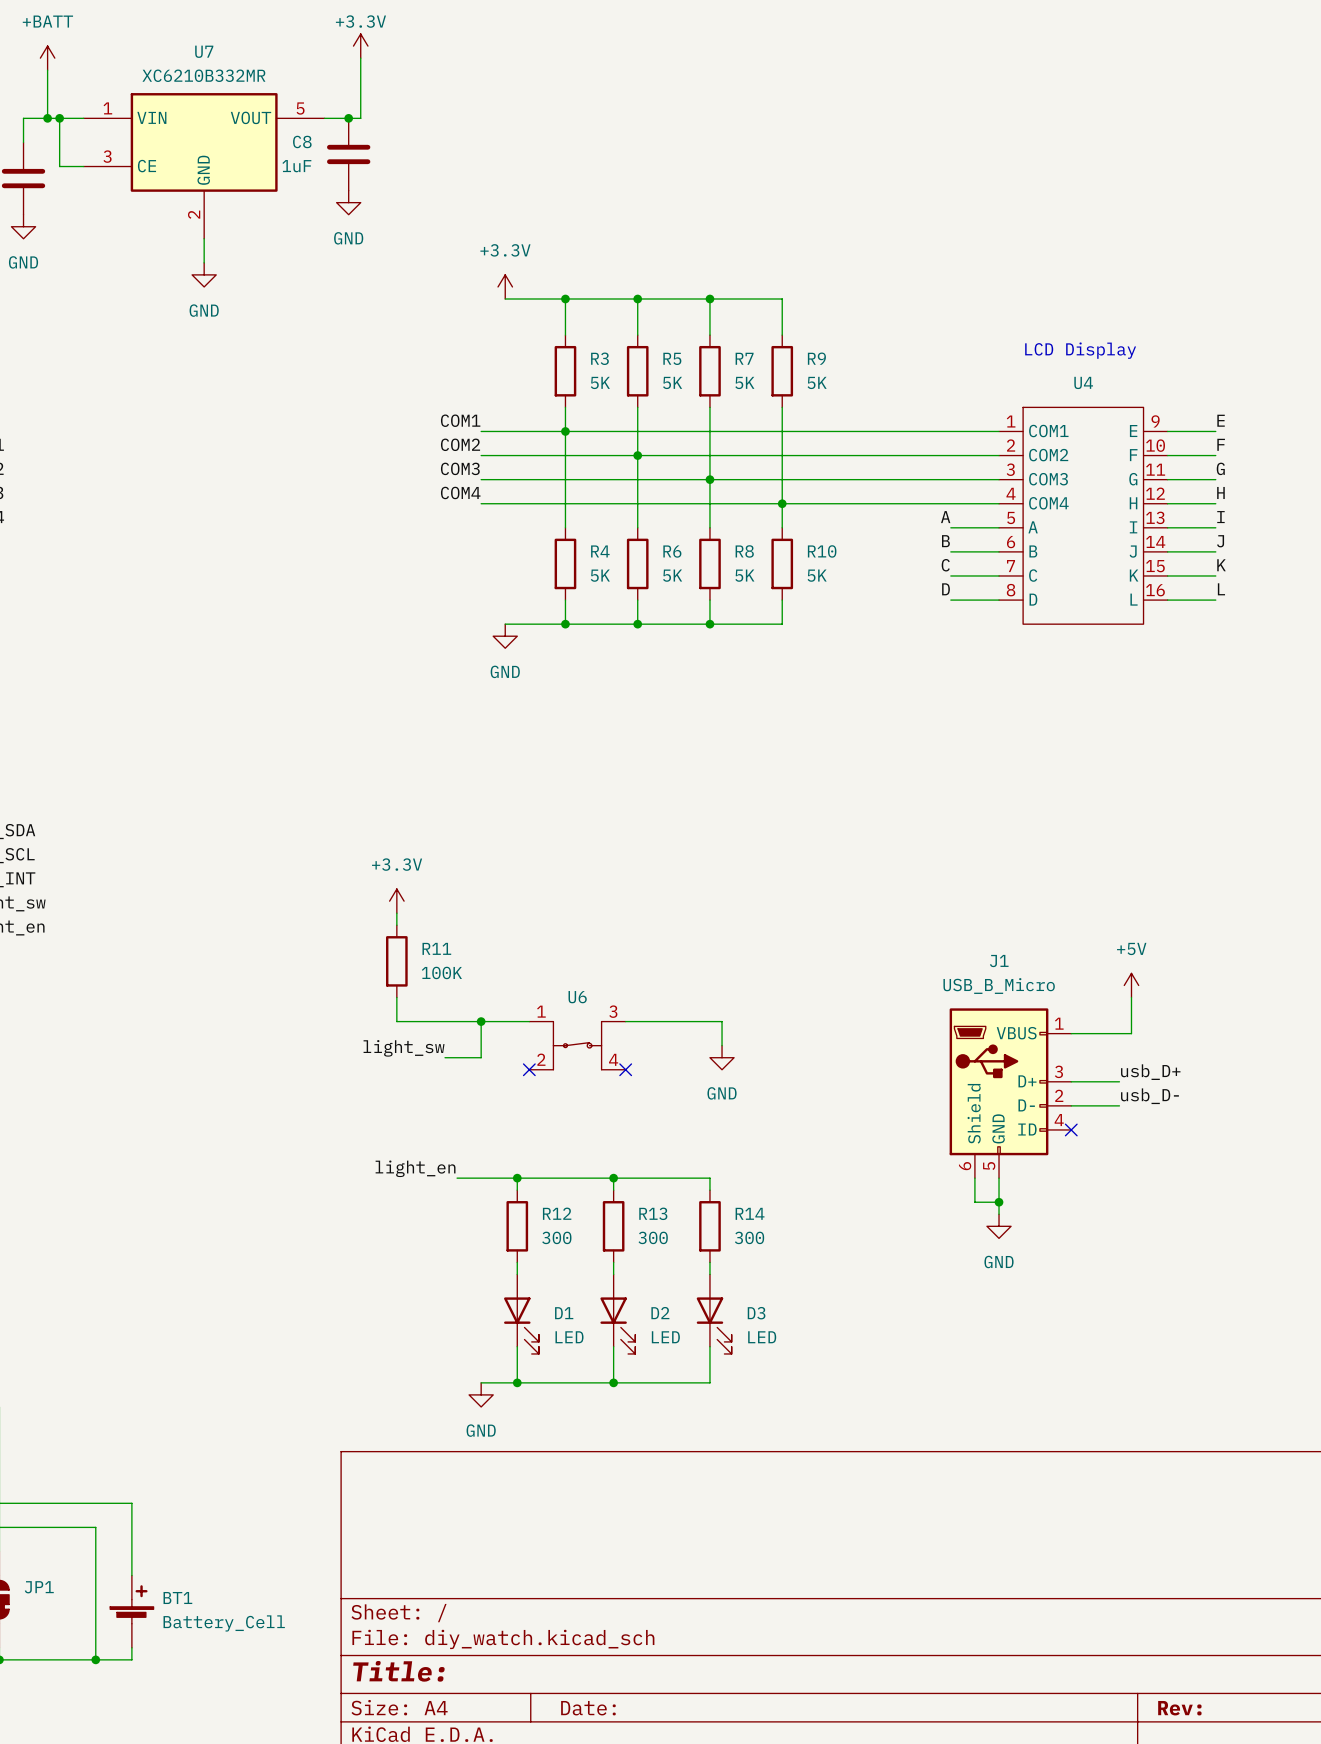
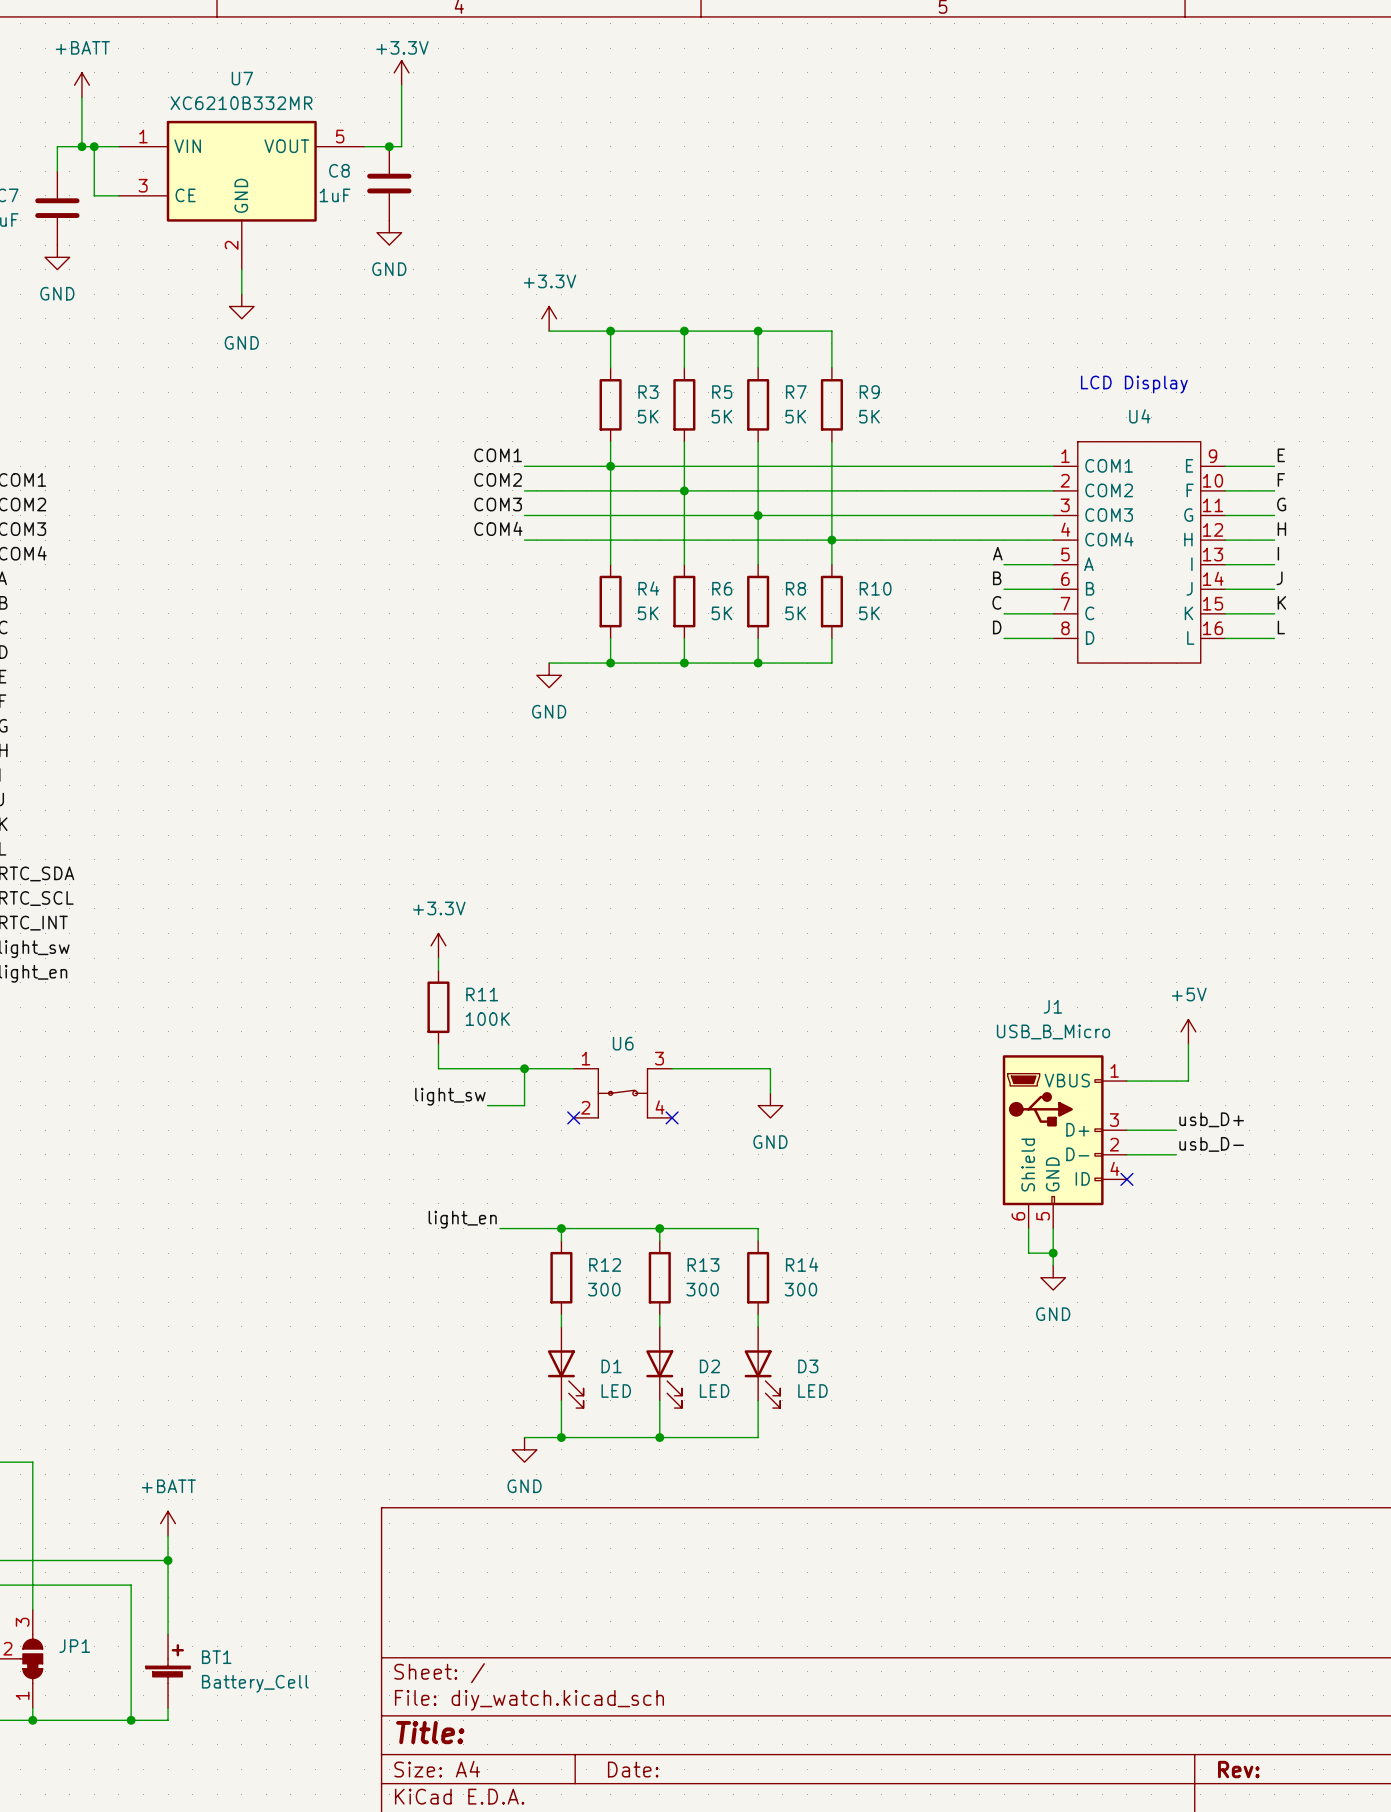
power symbol: none -> +BATT (168, 1523)
wire: none -> (168, 1535) (168, 1560)
junction: none -> (168, 1560)

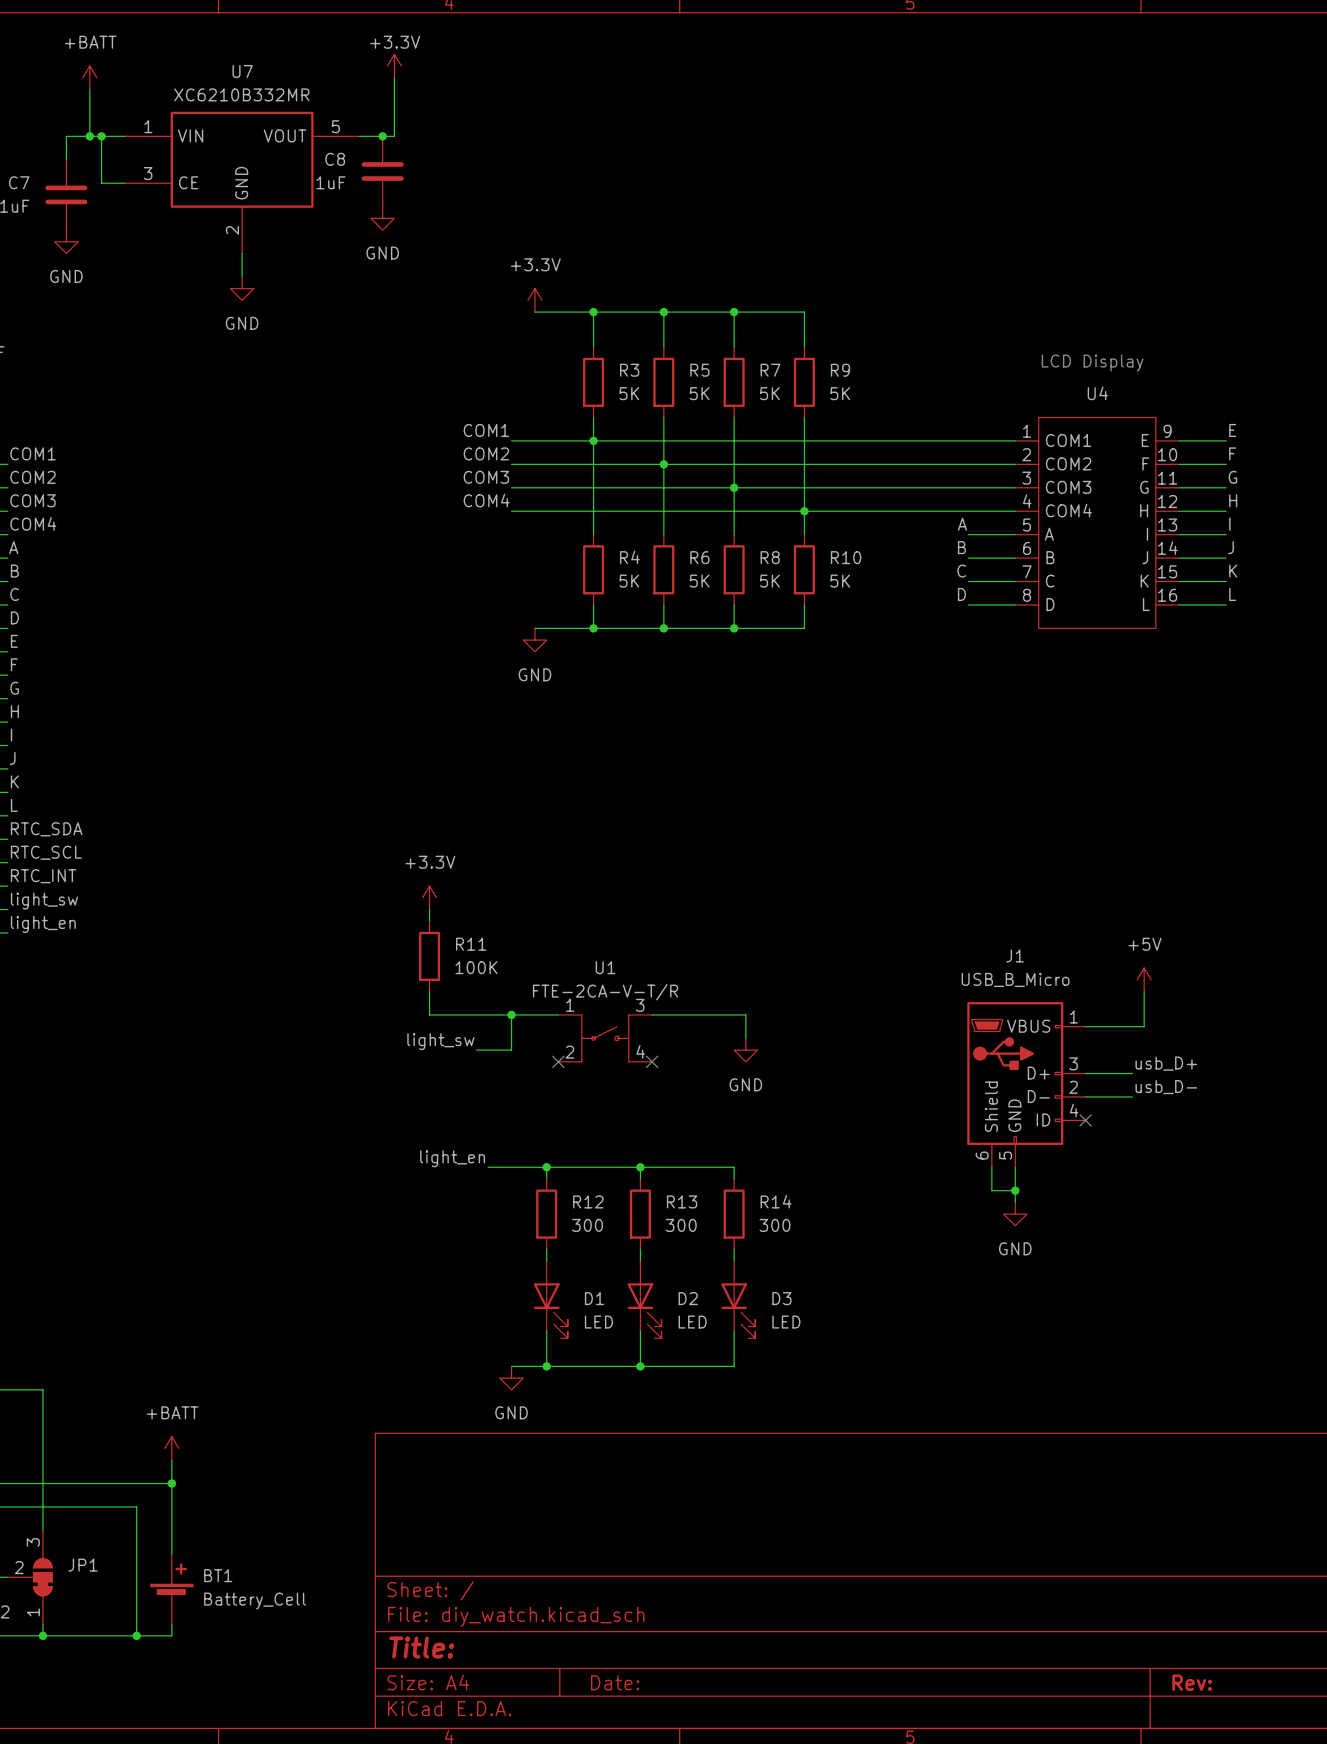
U6: (622, 1093) -> none
U1: none -> FTE-2CA-V-T/R (605, 1038)

